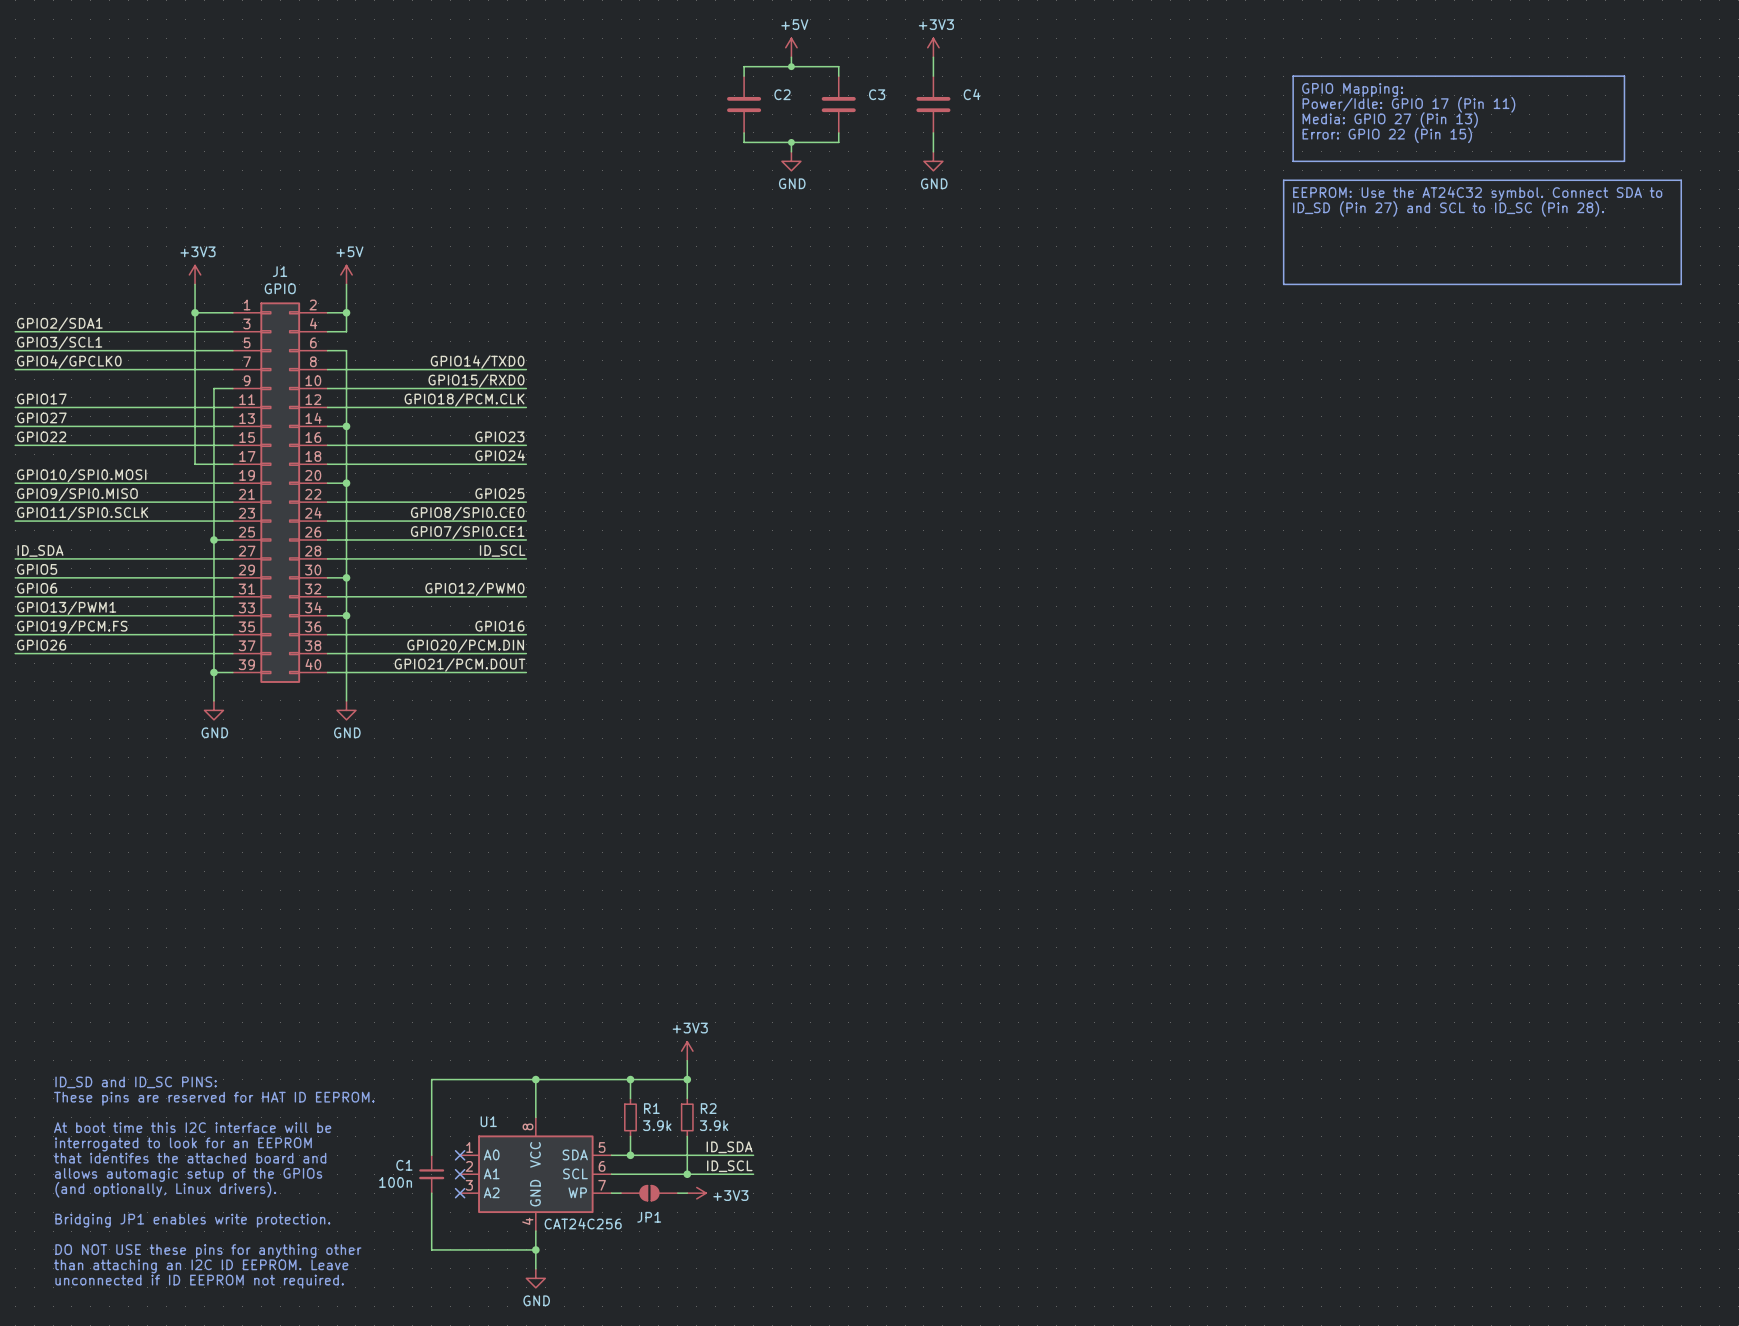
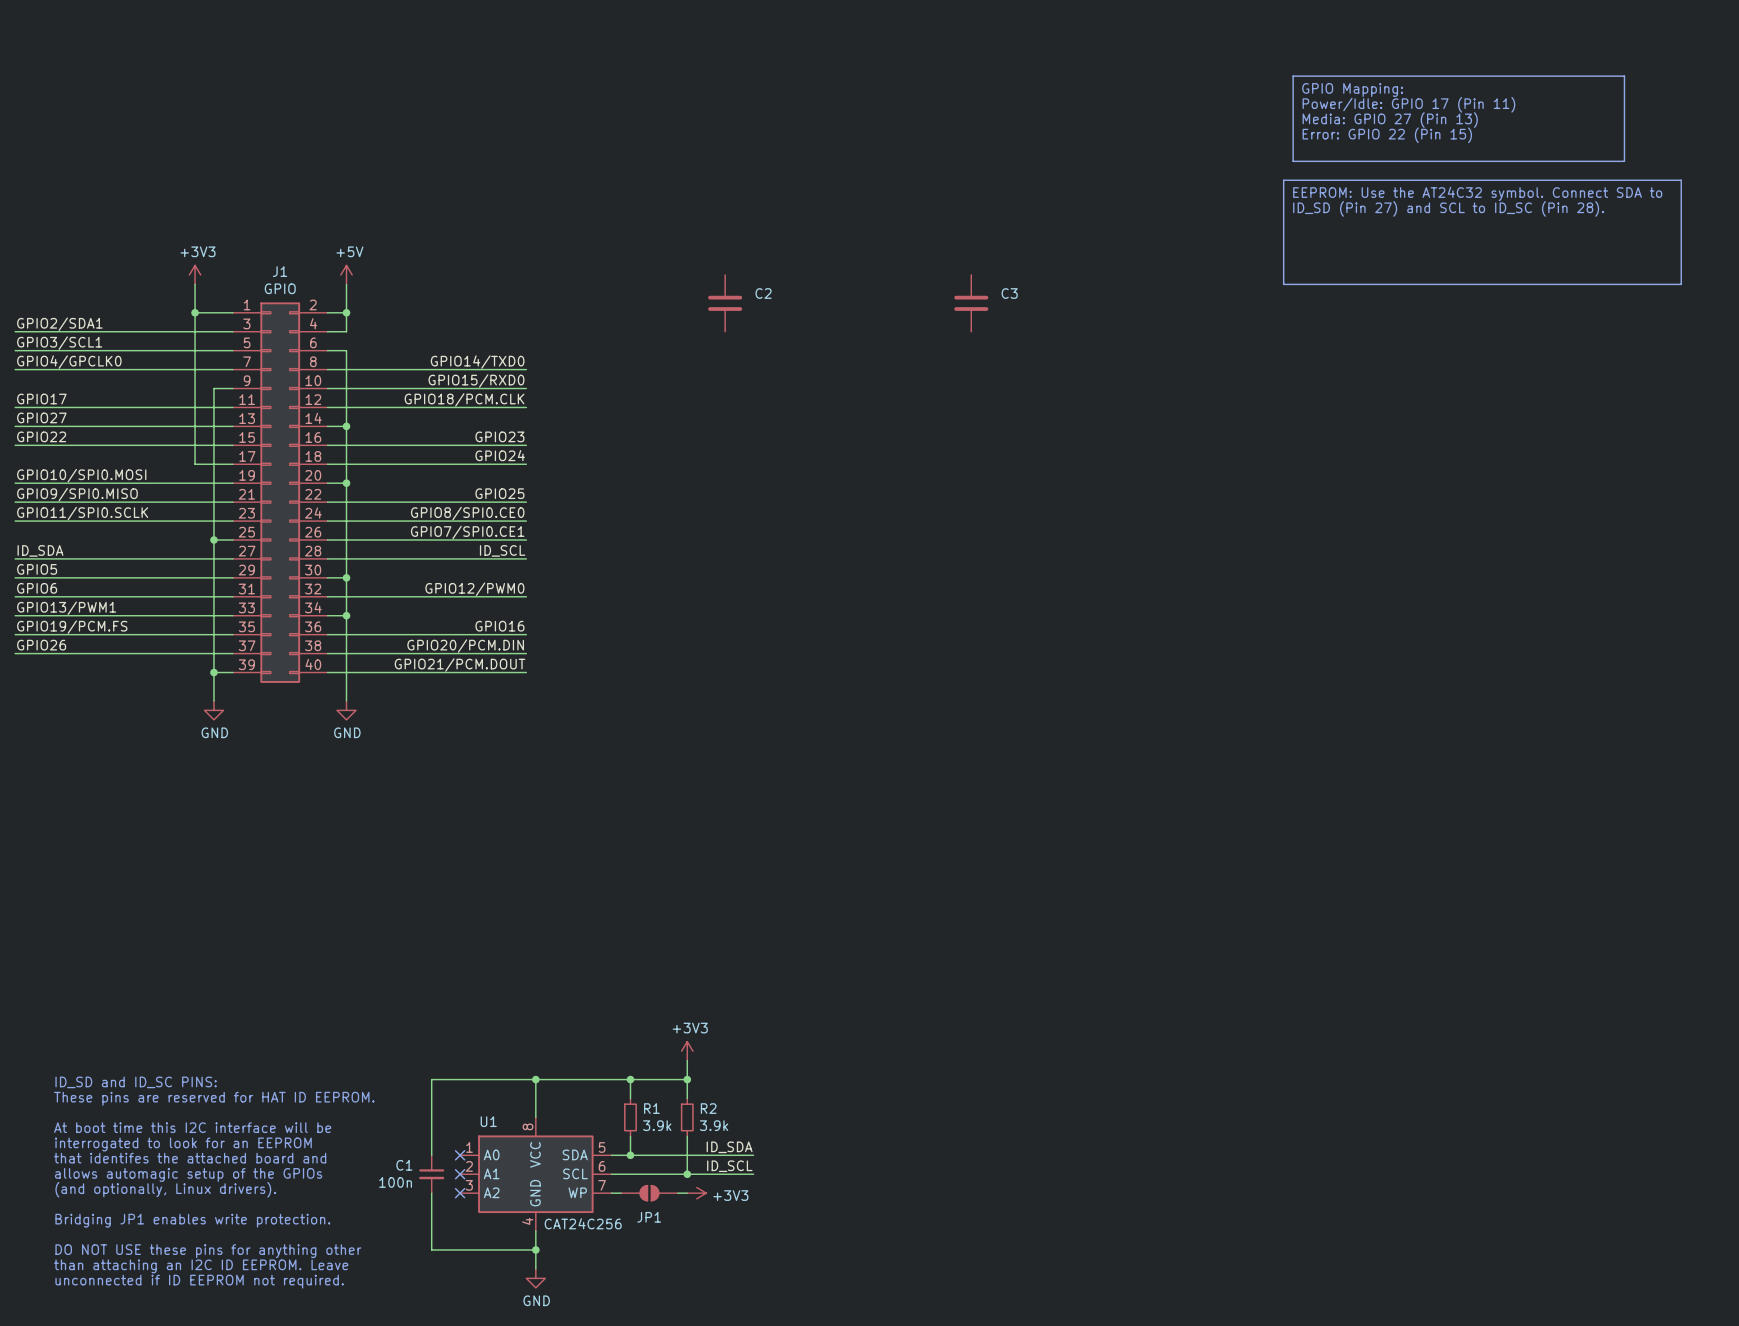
power symbol: +5V (791, 47) -> none
power symbol: +3V3 (933, 47) -> none
wire: (791, 57) (791, 66) -> none
wire: (933, 57) (933, 76) -> none
junction: (791, 66) -> none
wire: (744, 76) (744, 66) (838, 66) (838, 76) -> none
C2 position: (744, 104) -> (725, 303)
C3 position: (838, 104) -> (971, 303)
C4: (933, 104) -> none
wire: (744, 132) (744, 142) (838, 142) (838, 132) -> none
wire: (933, 132) (933, 151) -> none
wire: (791, 142) (791, 151) -> none
junction: (791, 142) -> none
power symbol: GND (791, 161) -> none
power symbol: GND (933, 161) -> none

